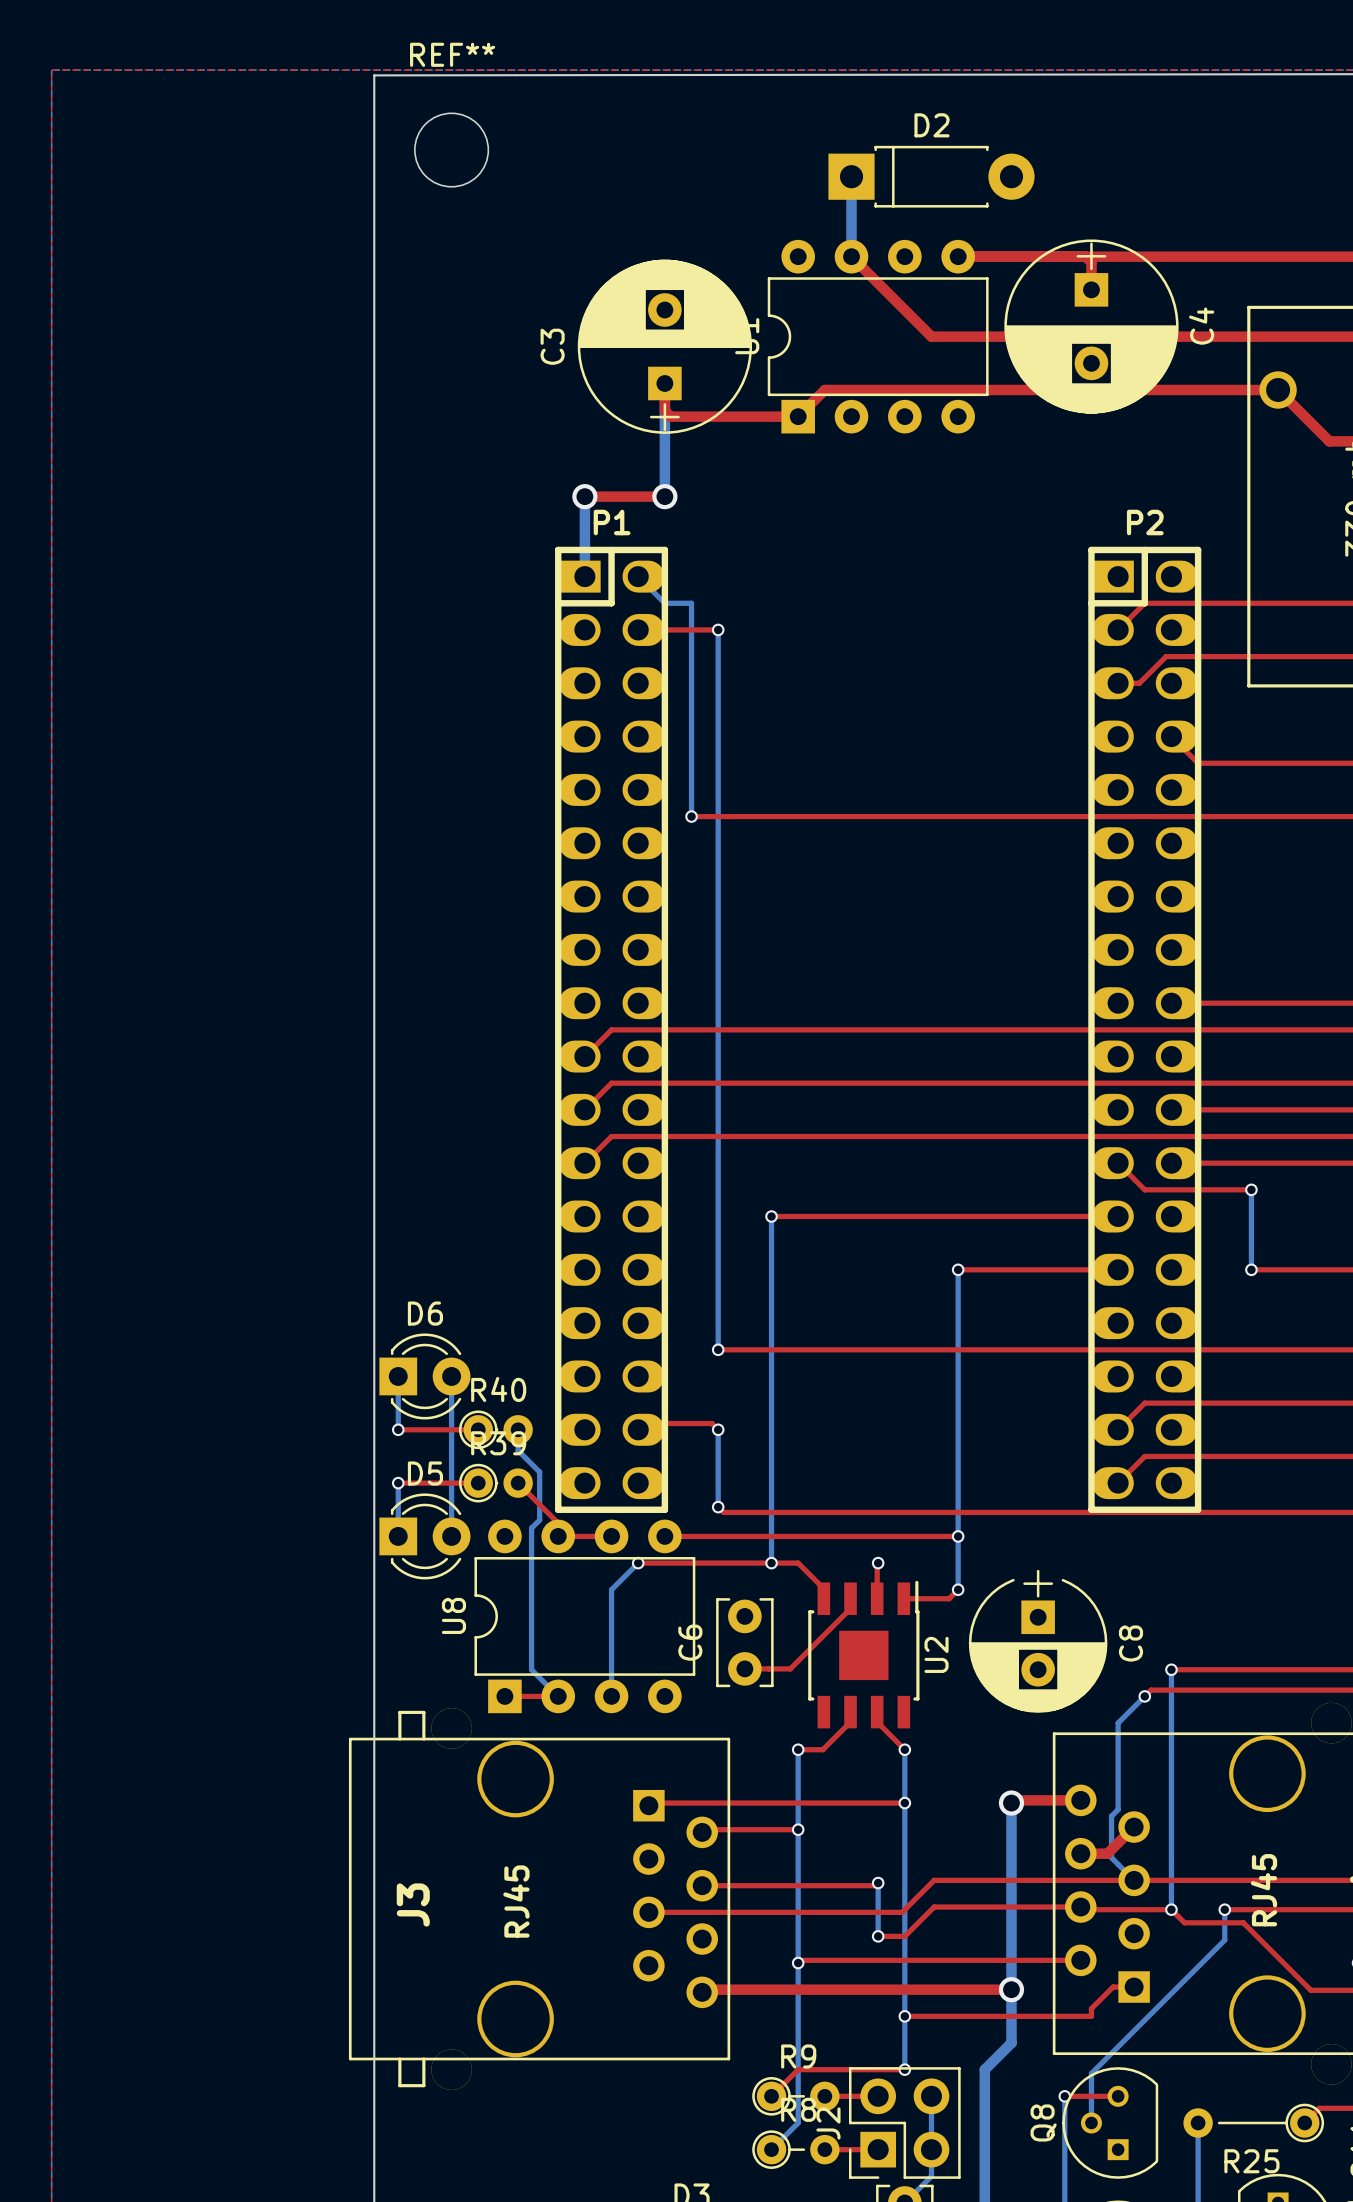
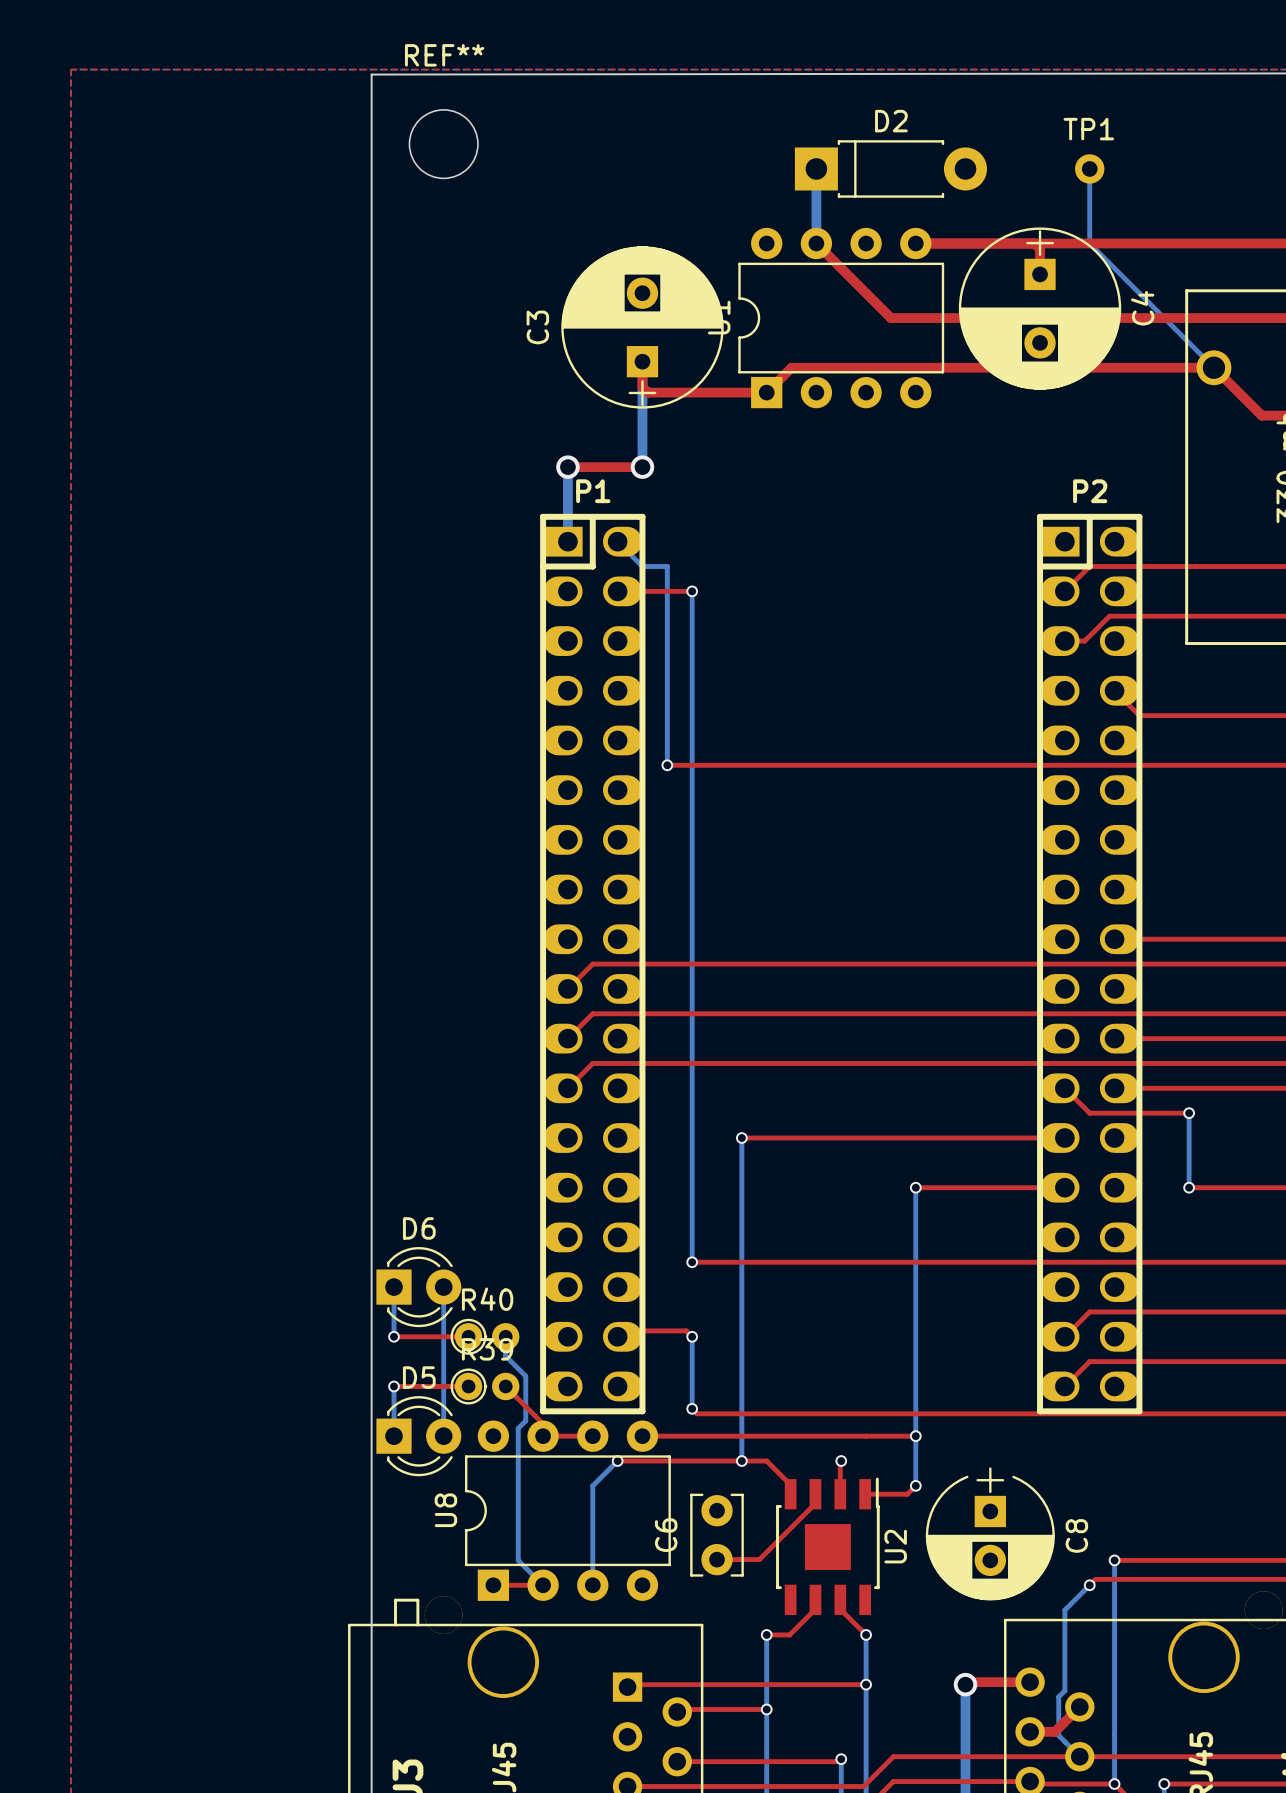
bottom track: none -> (1089, 168) (1089, 243) (1213, 367)
TP1: none -> (1089, 168)

